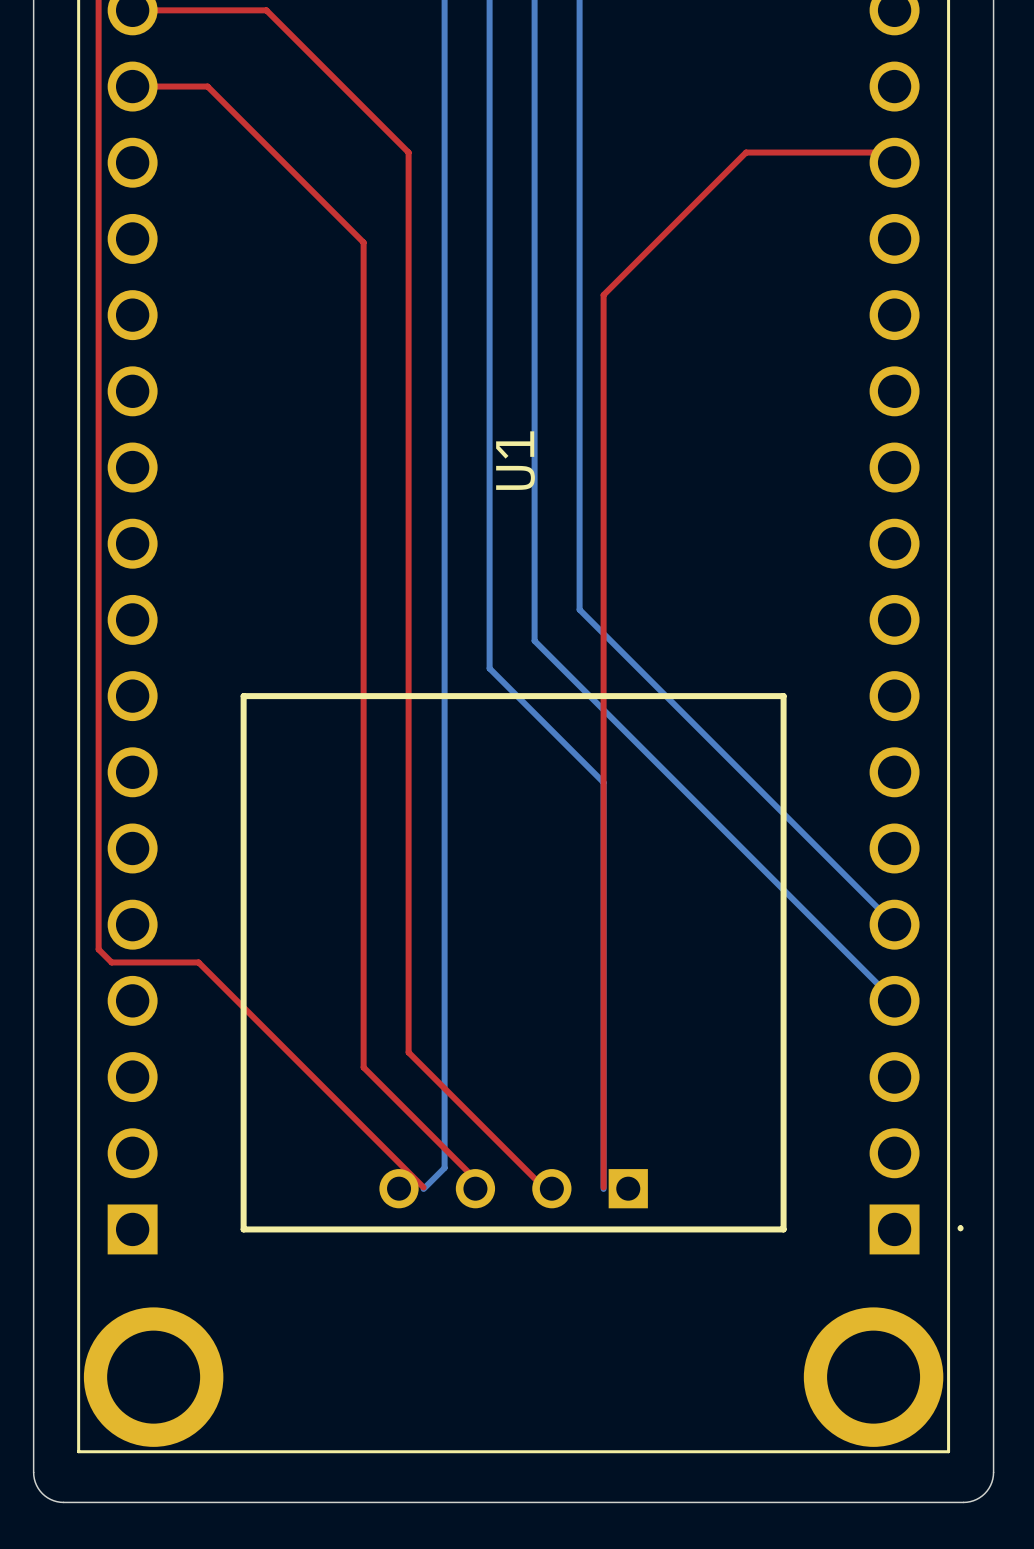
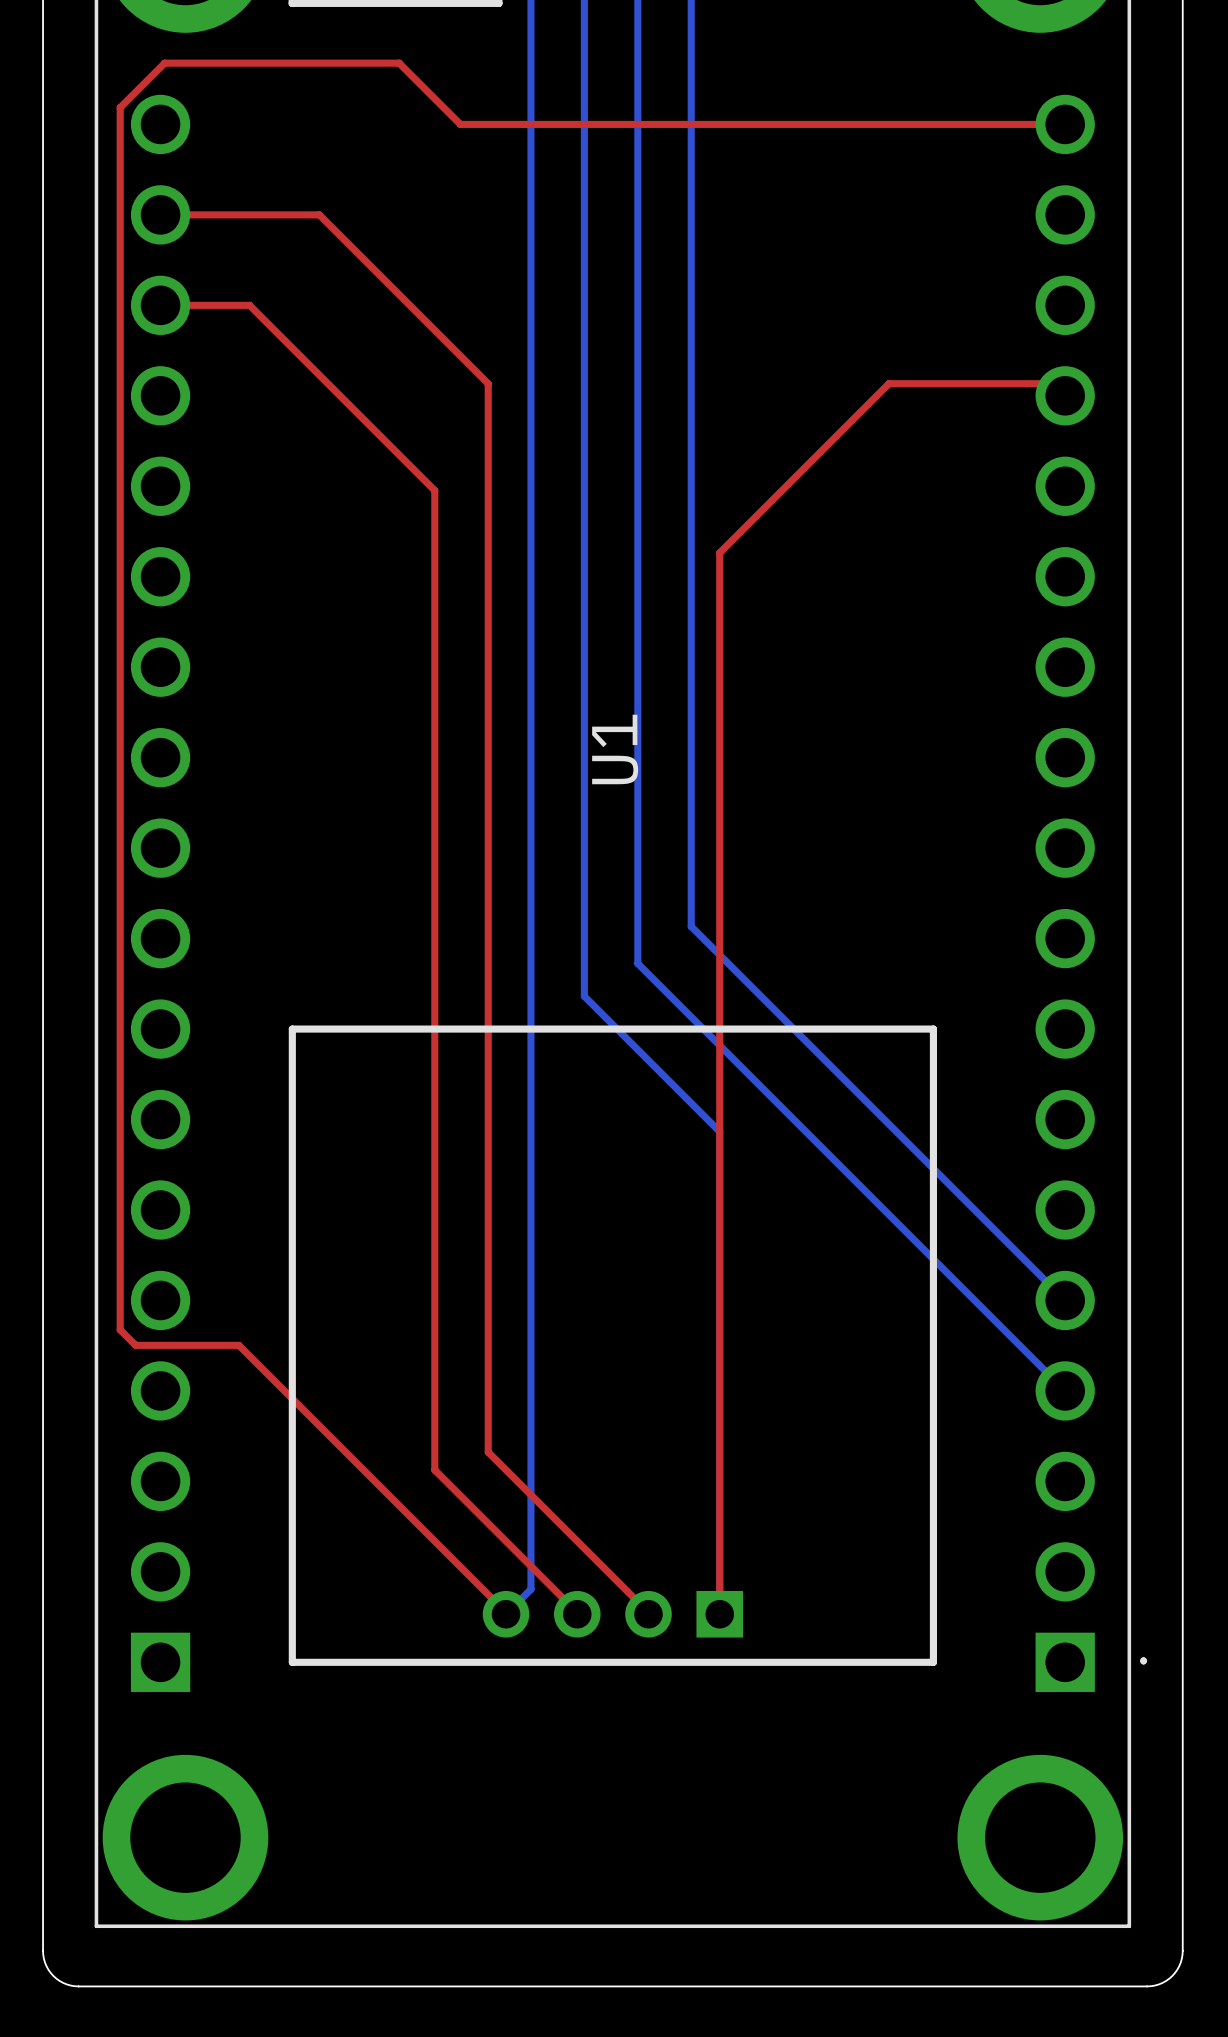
part footprint: [379, 1169, 648, 1209] -> [482, 1590, 744, 1638]

